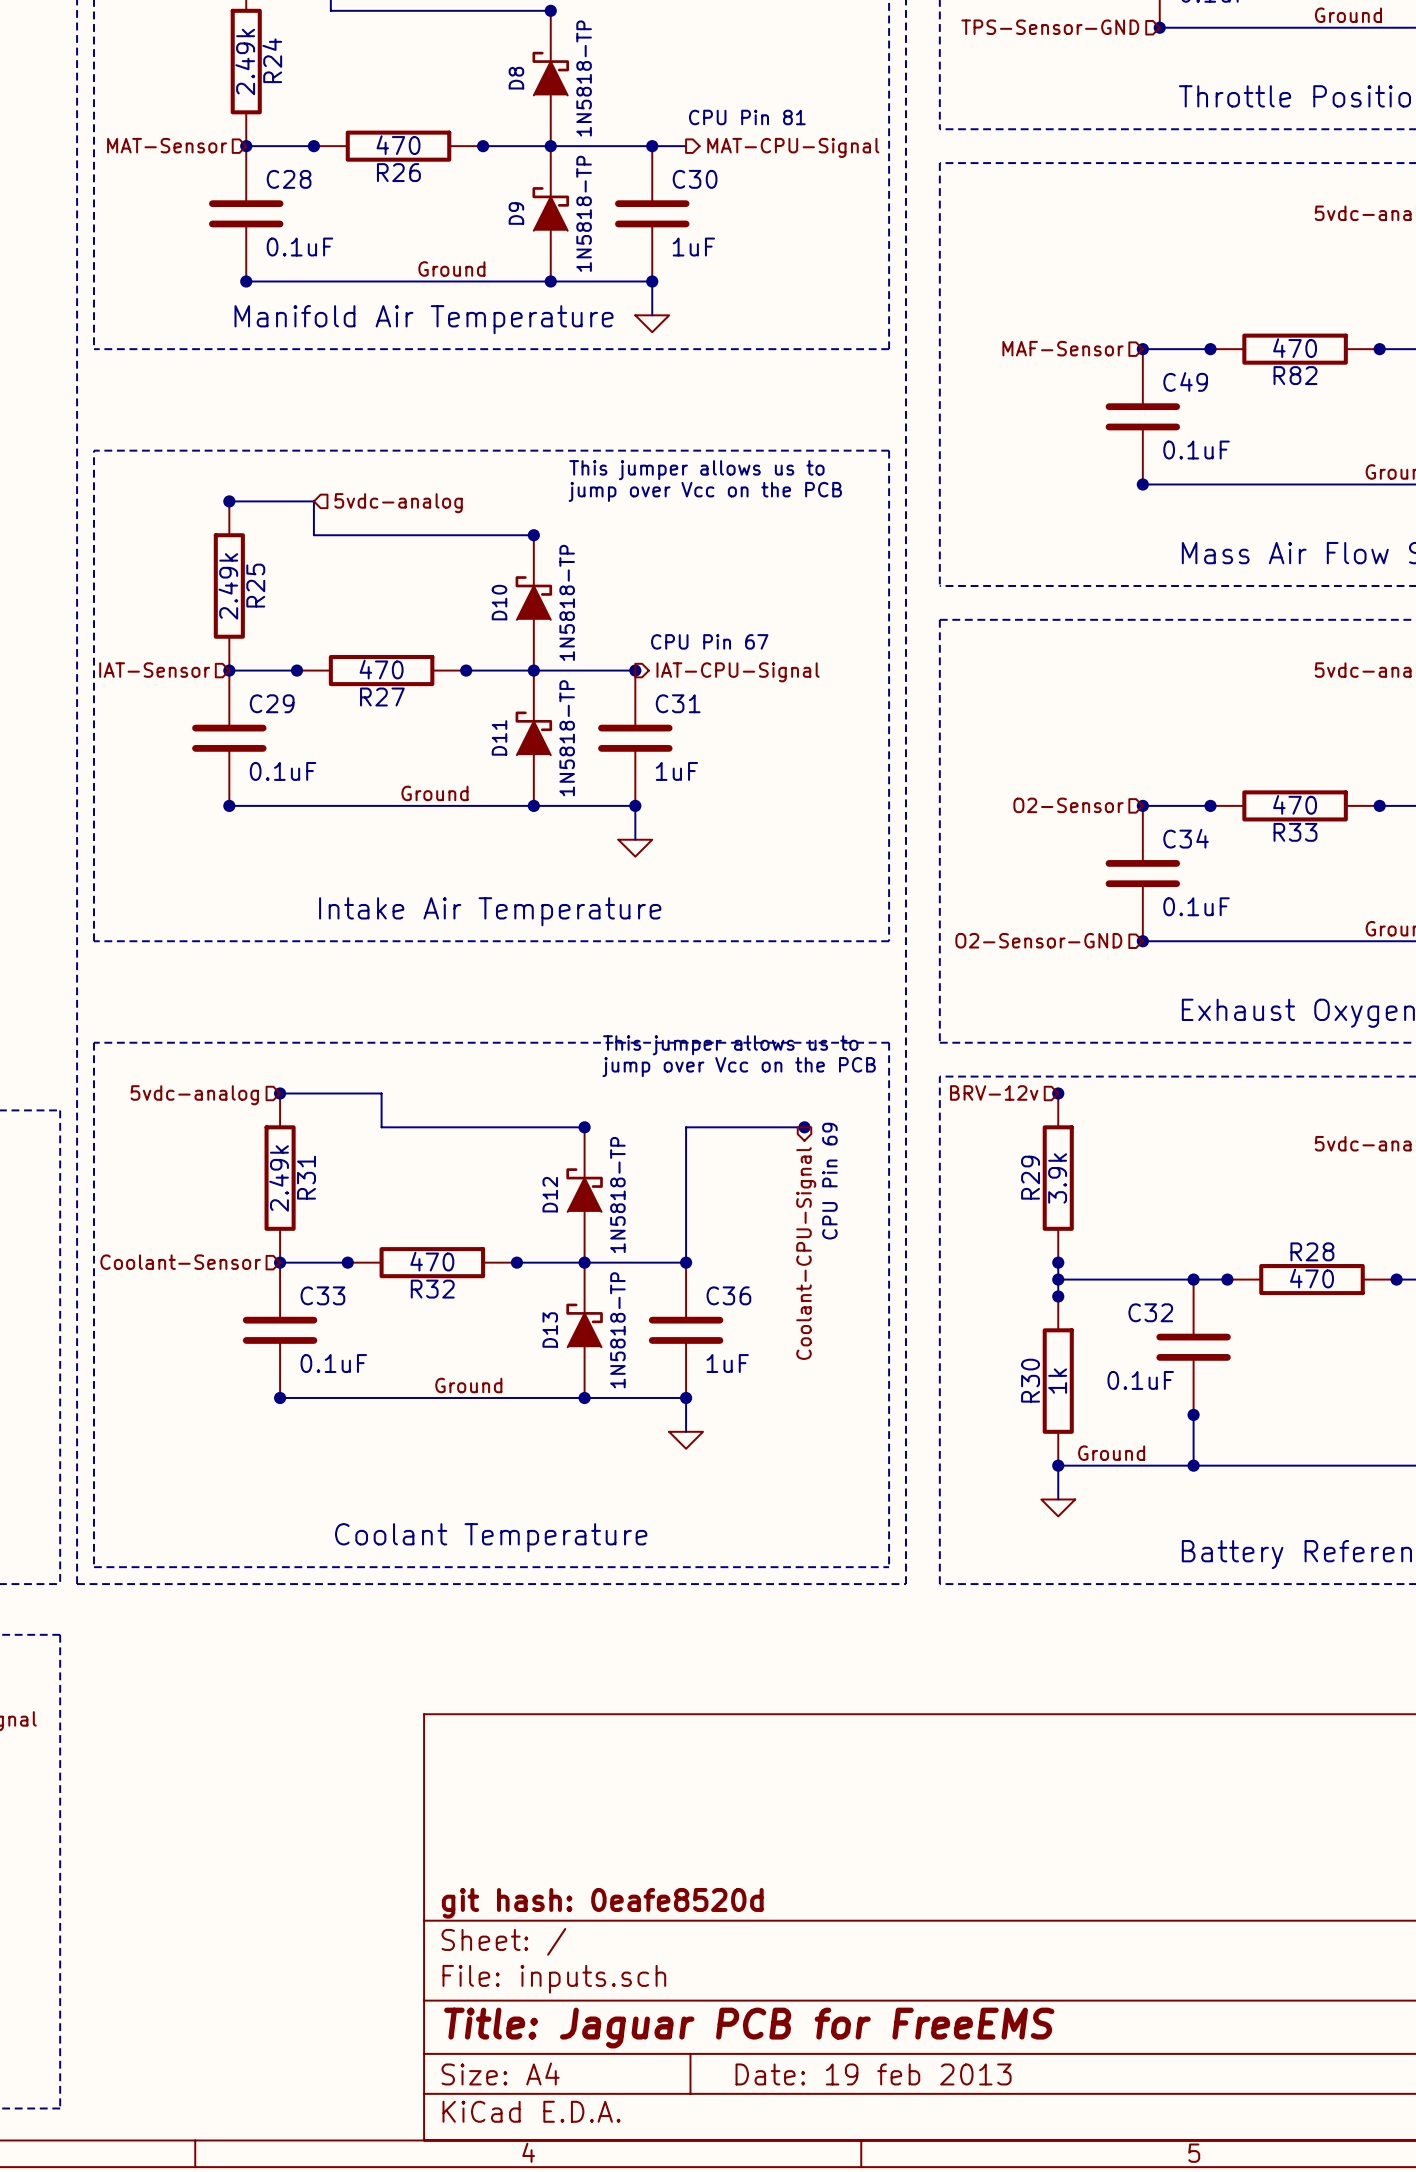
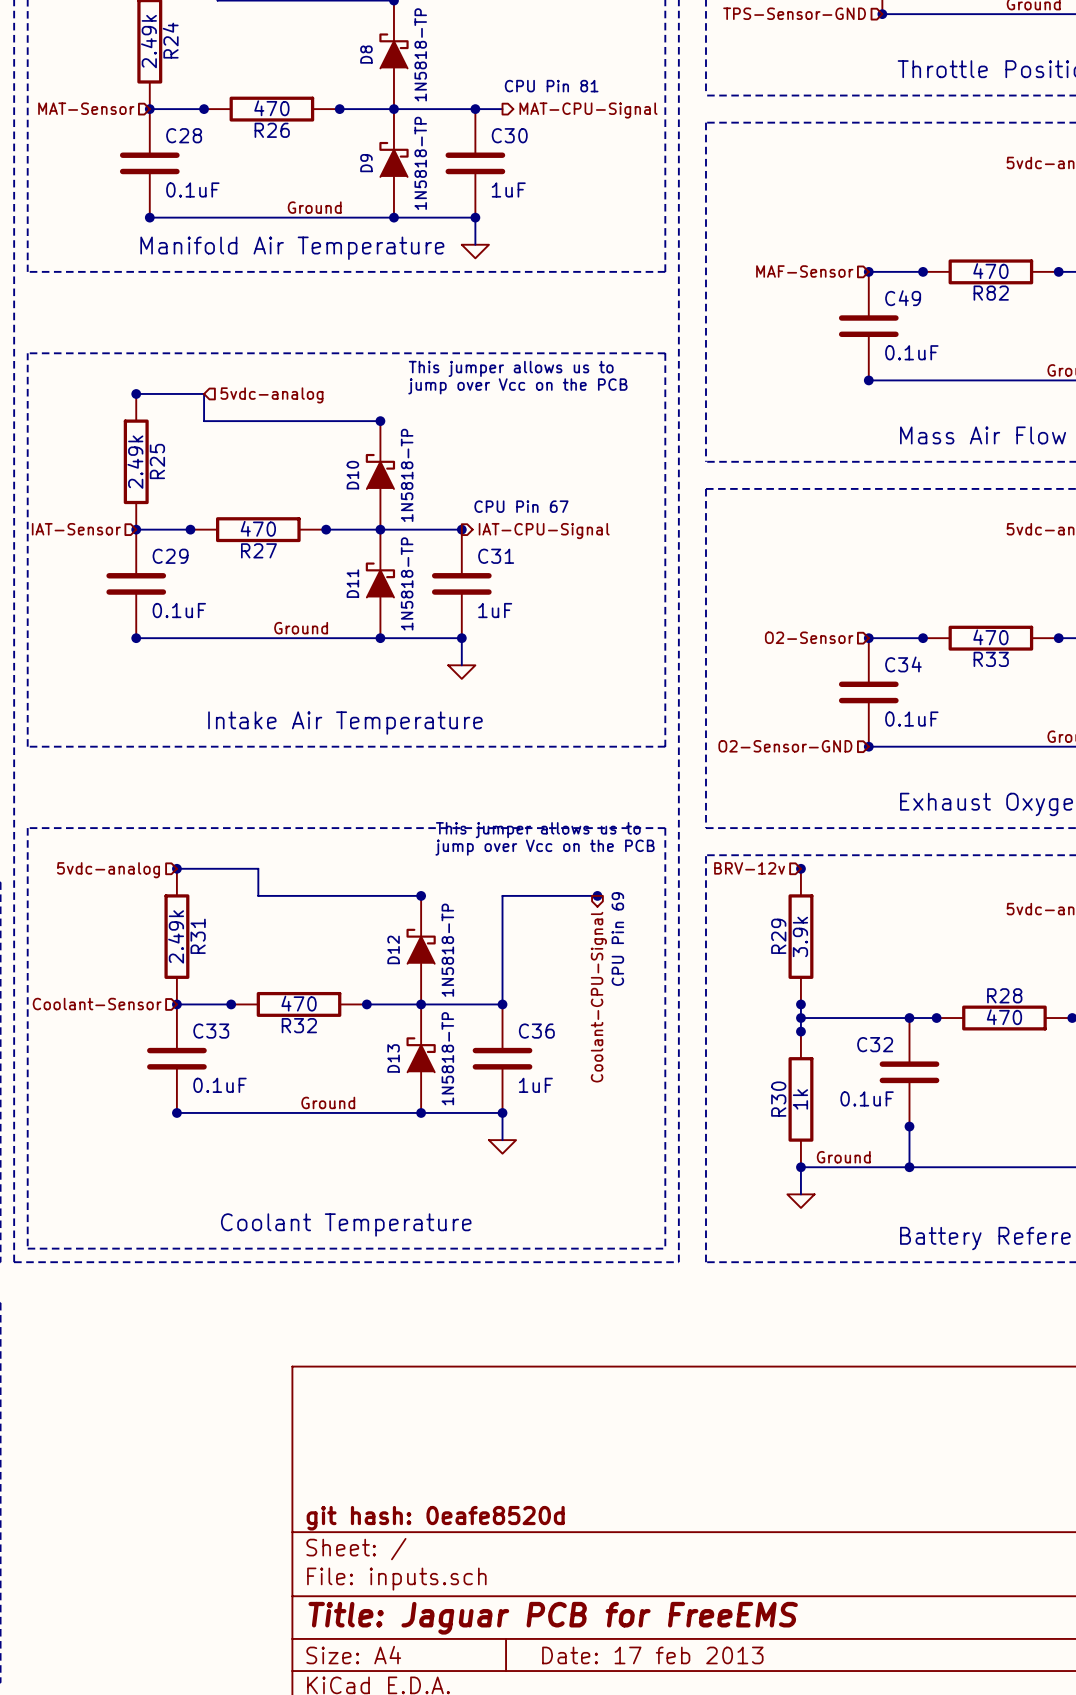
title block: Date: 19 feb 2013 (873, 2074) -> Date: 17 feb 2013 (652, 1655)

